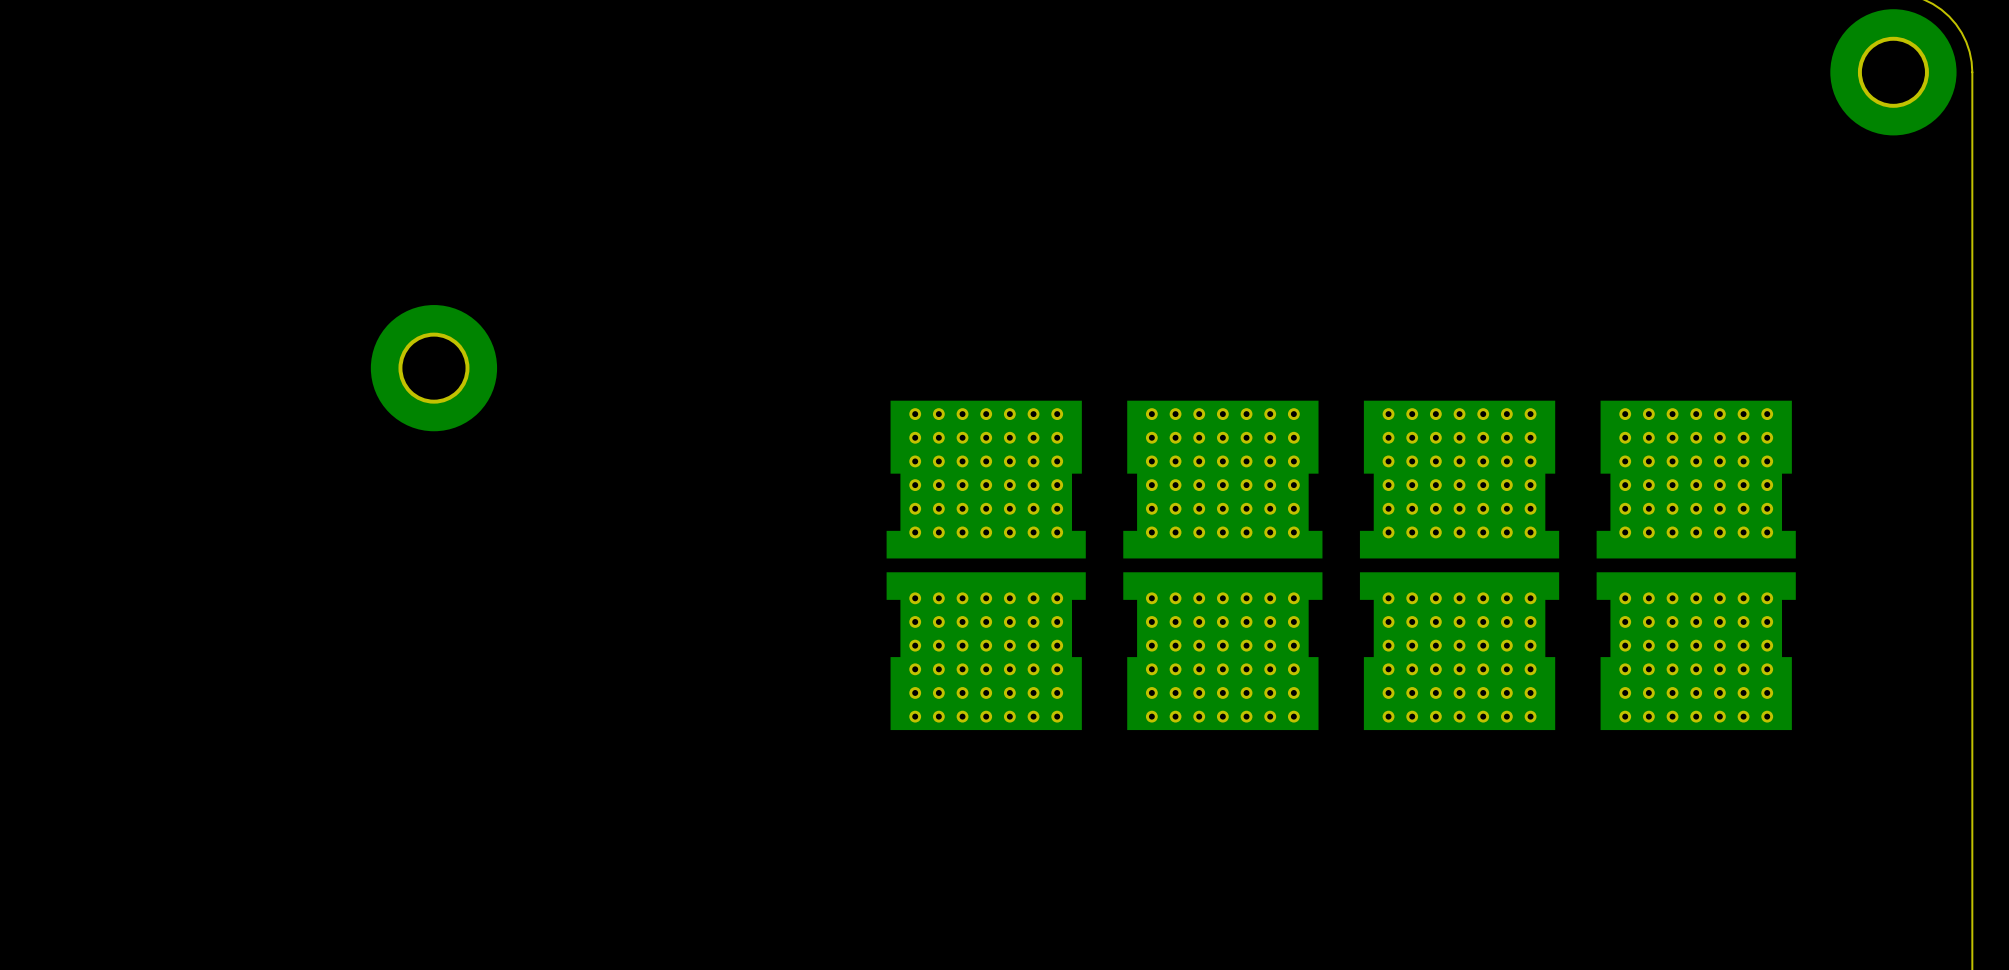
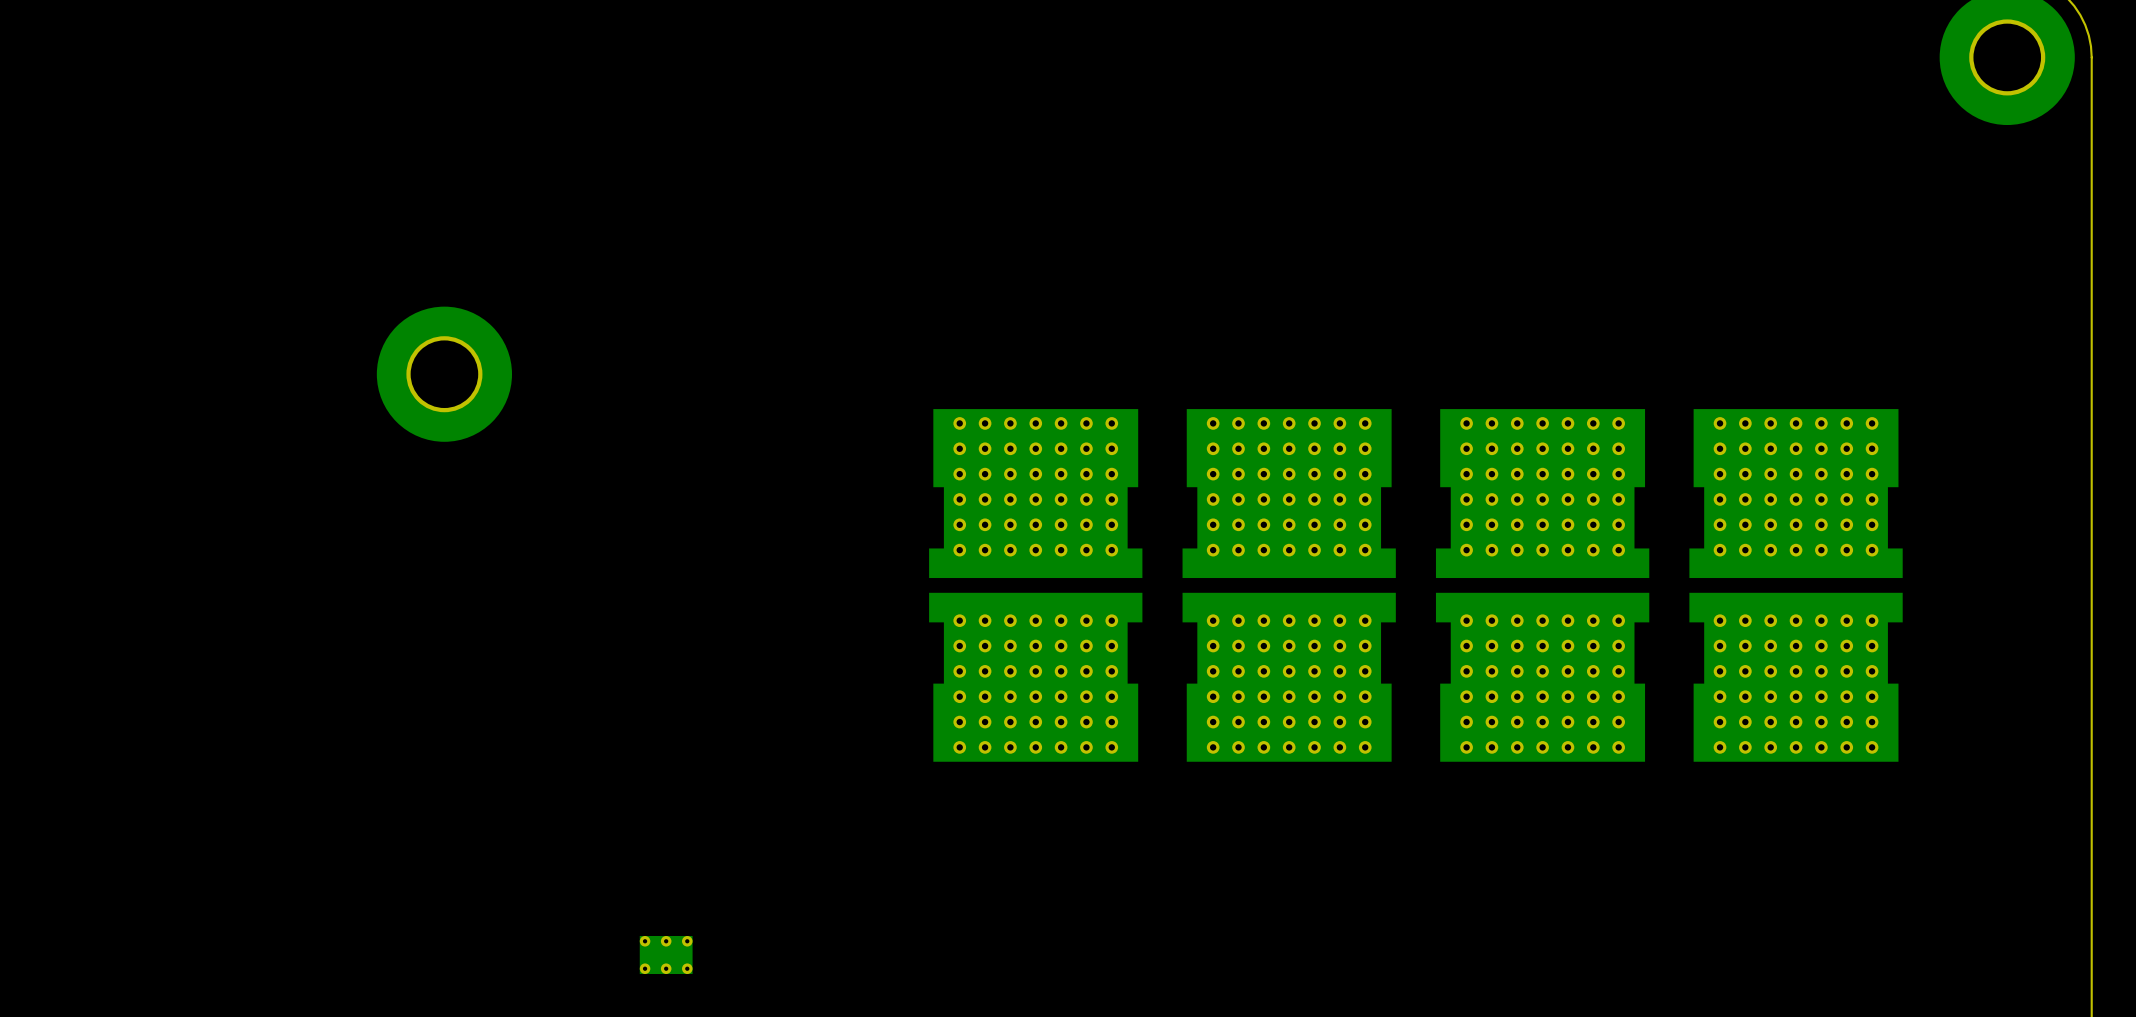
part: none -> (666, 954)

